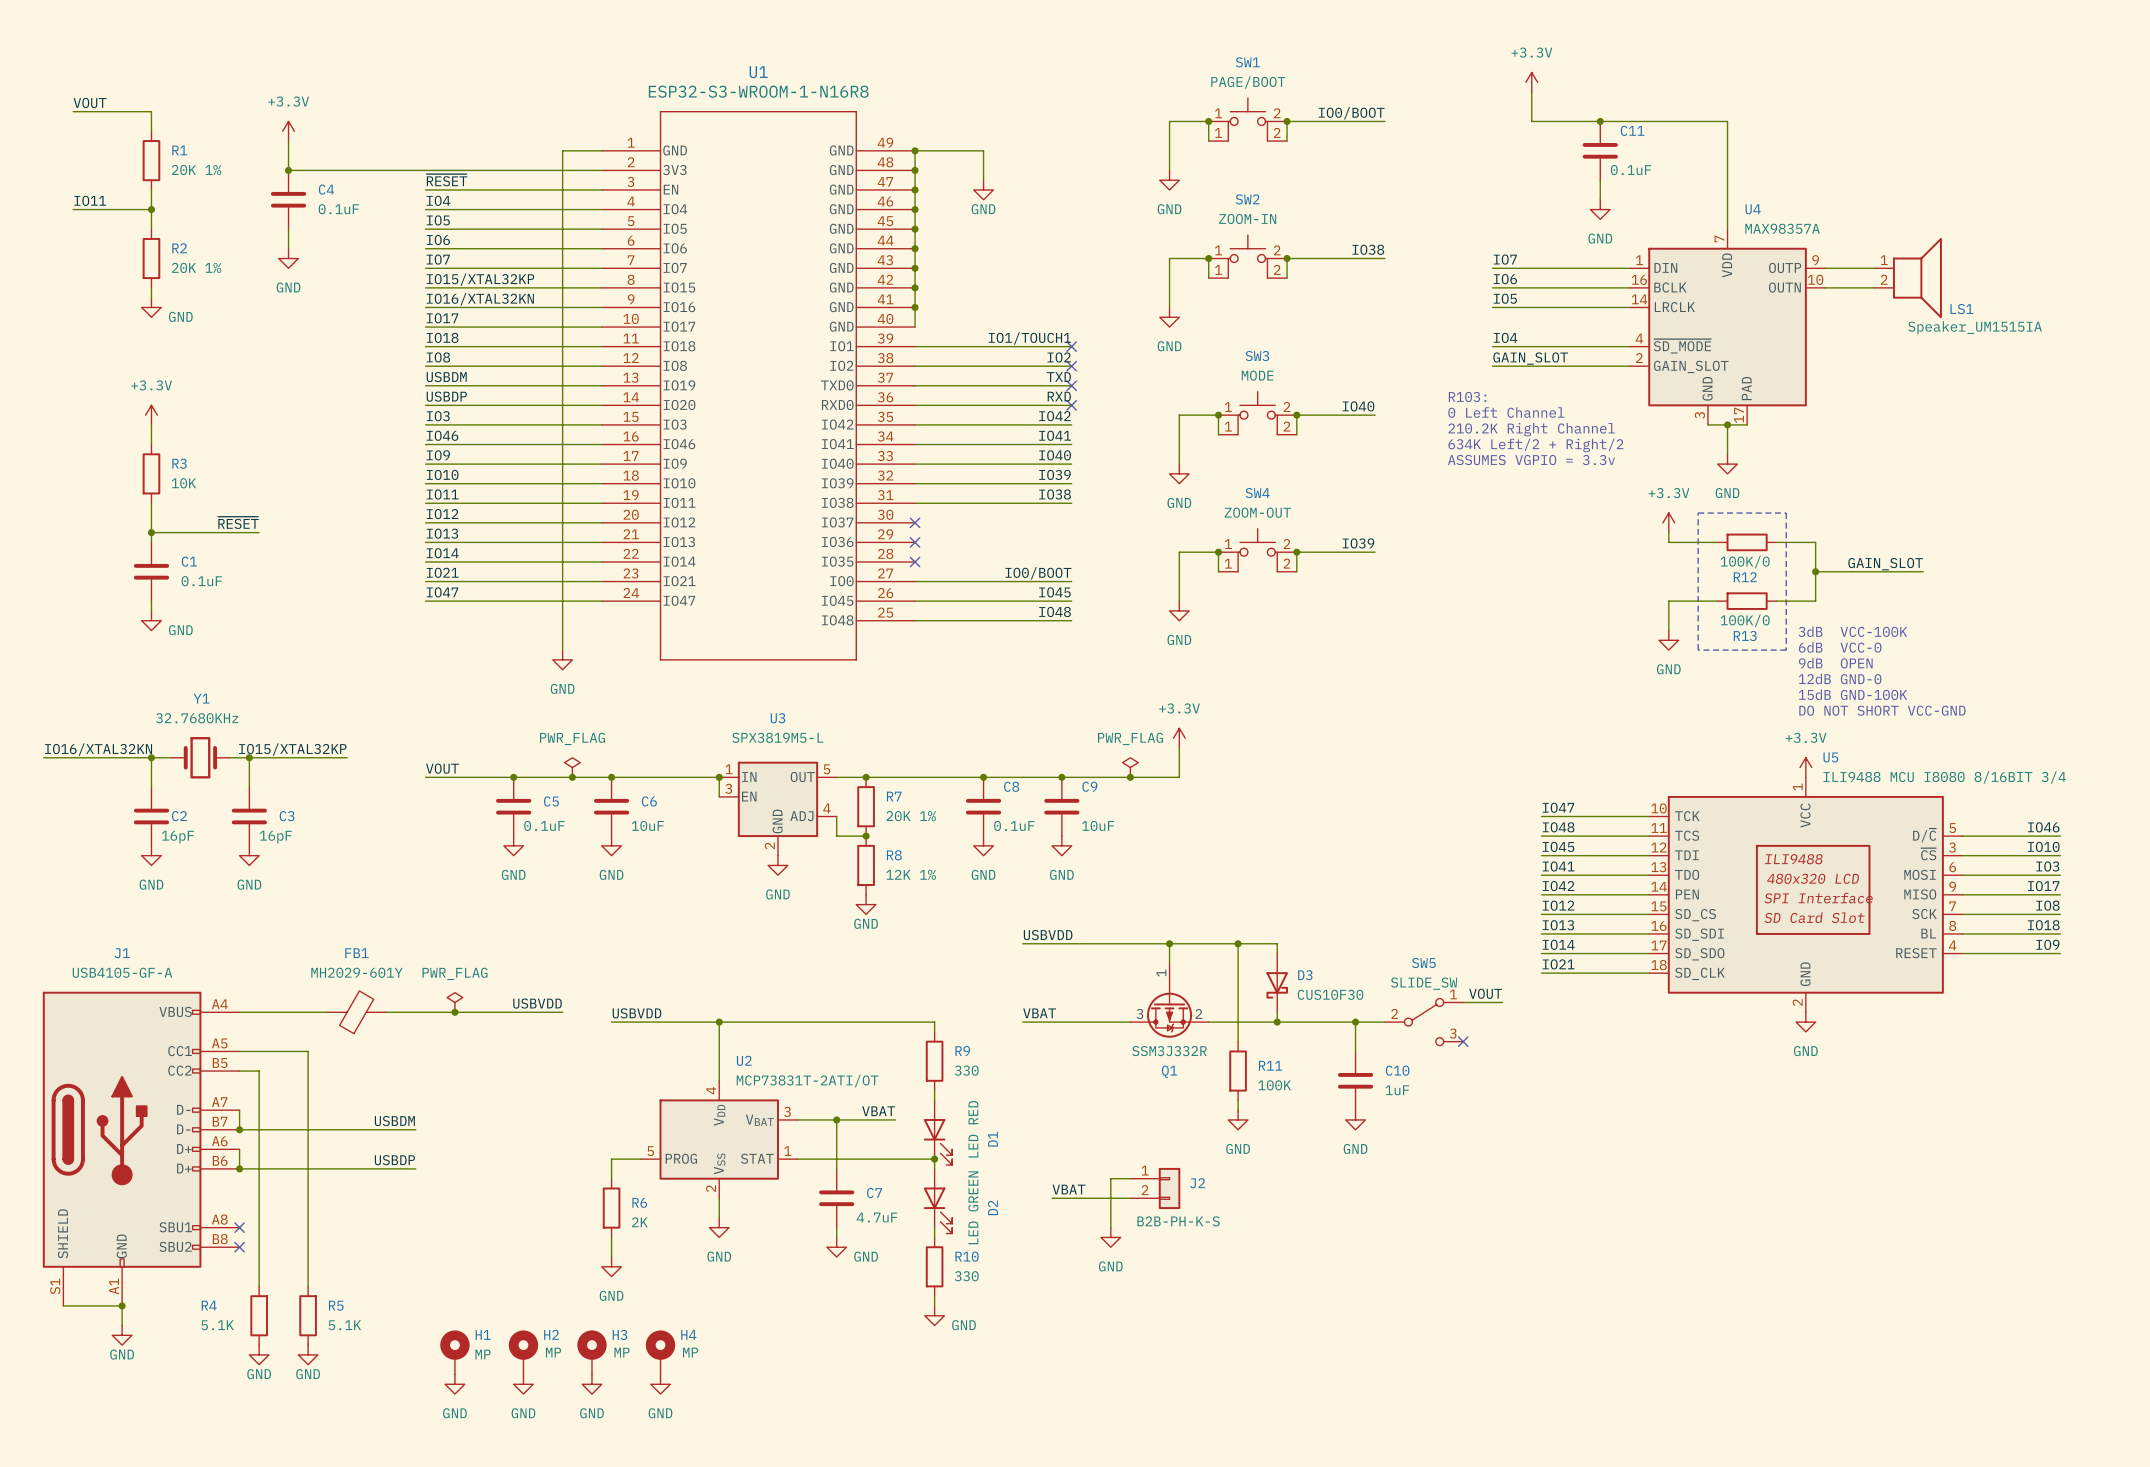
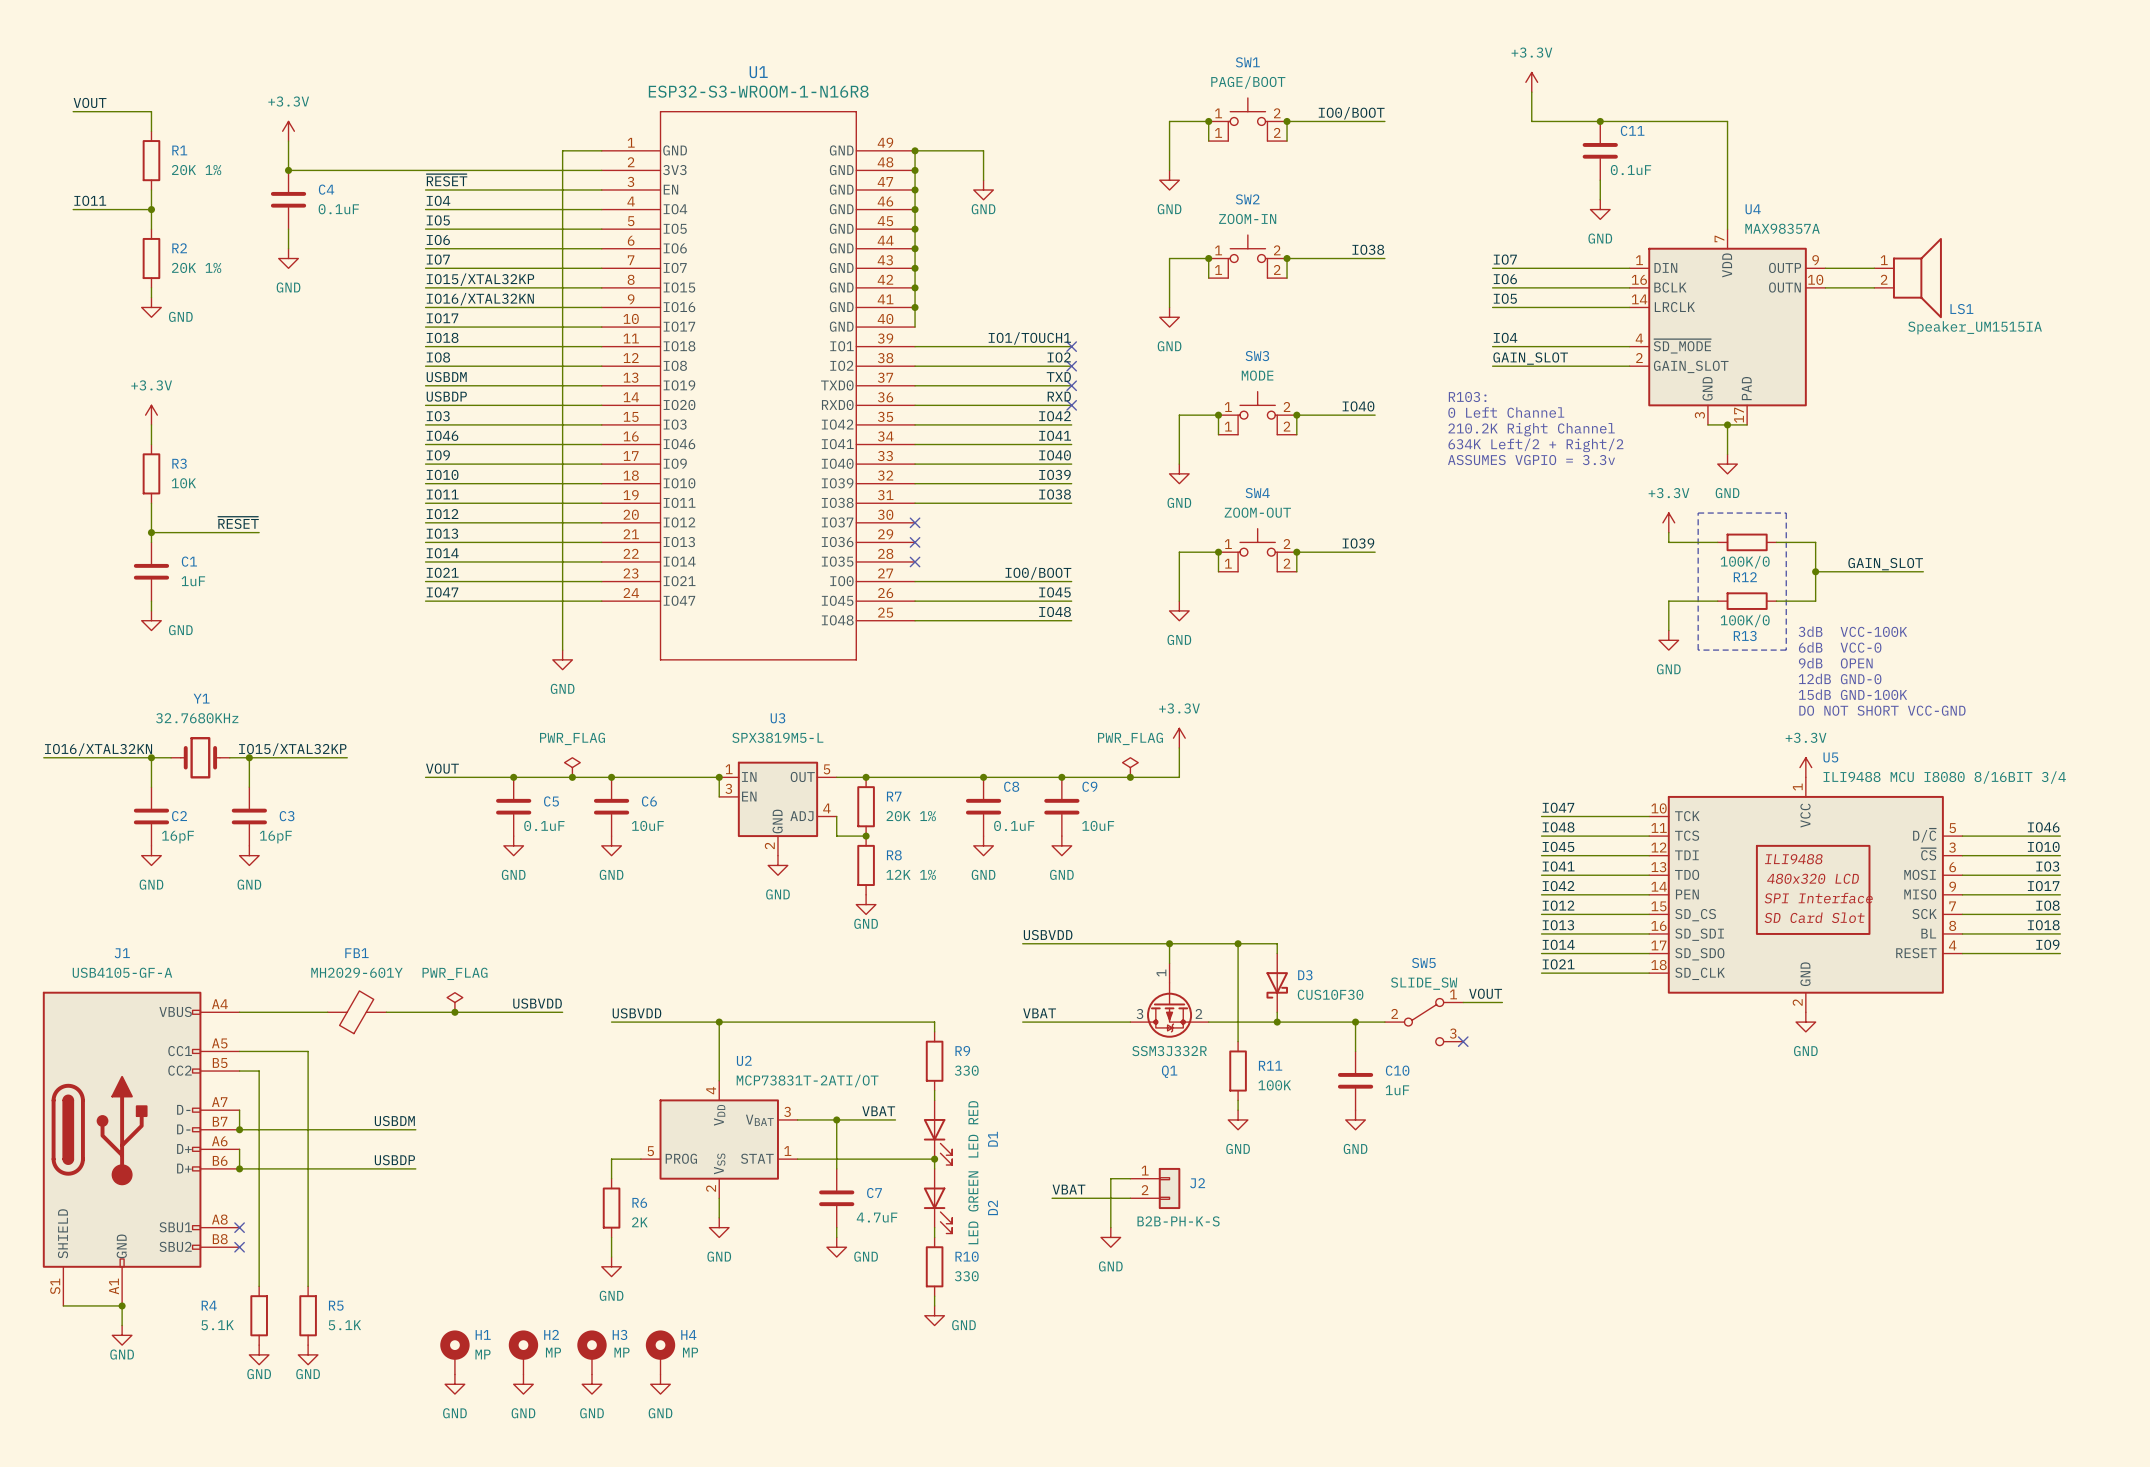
C1 value: 0.1uF (201, 581) -> 1uF (193, 581)

